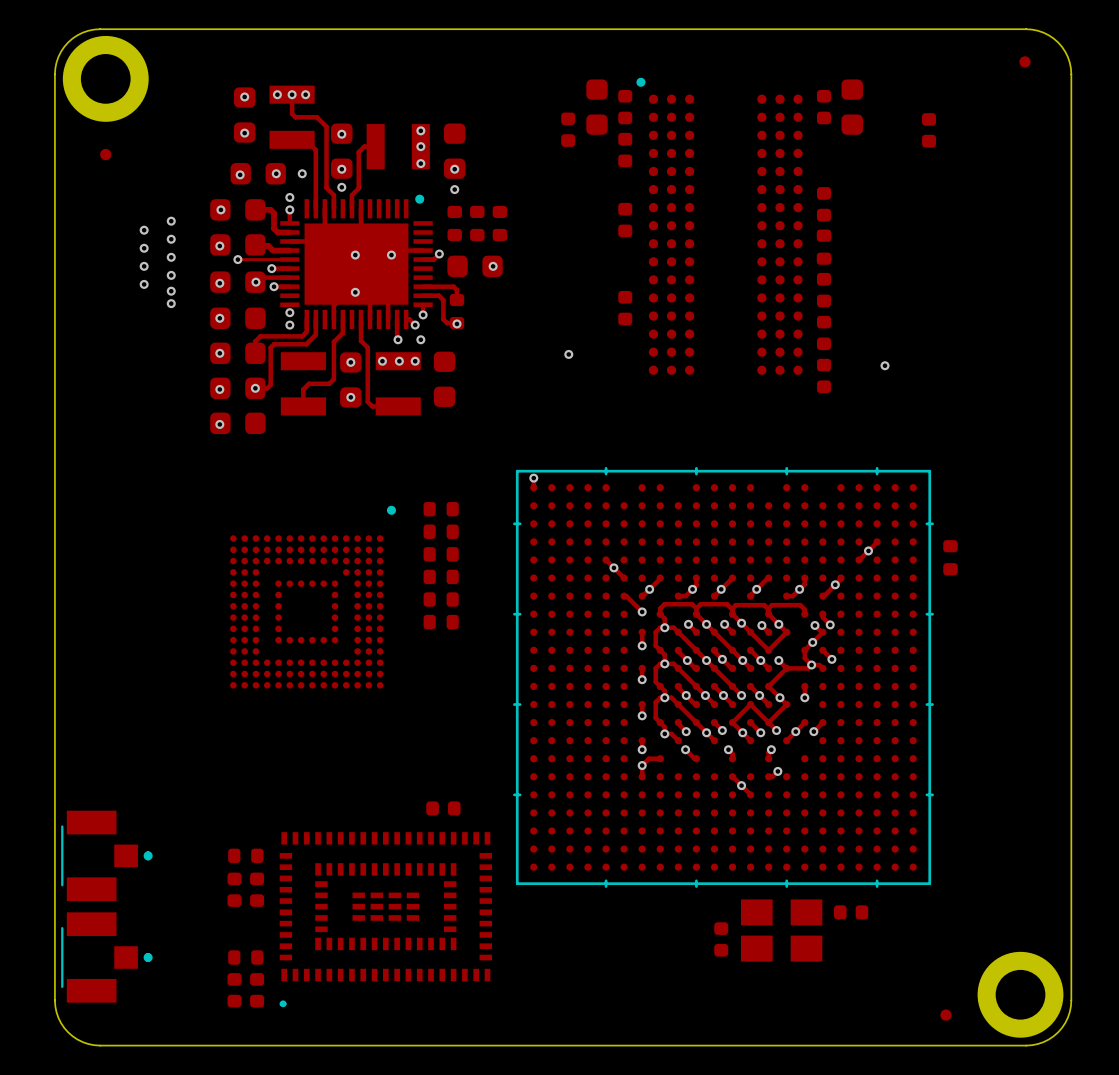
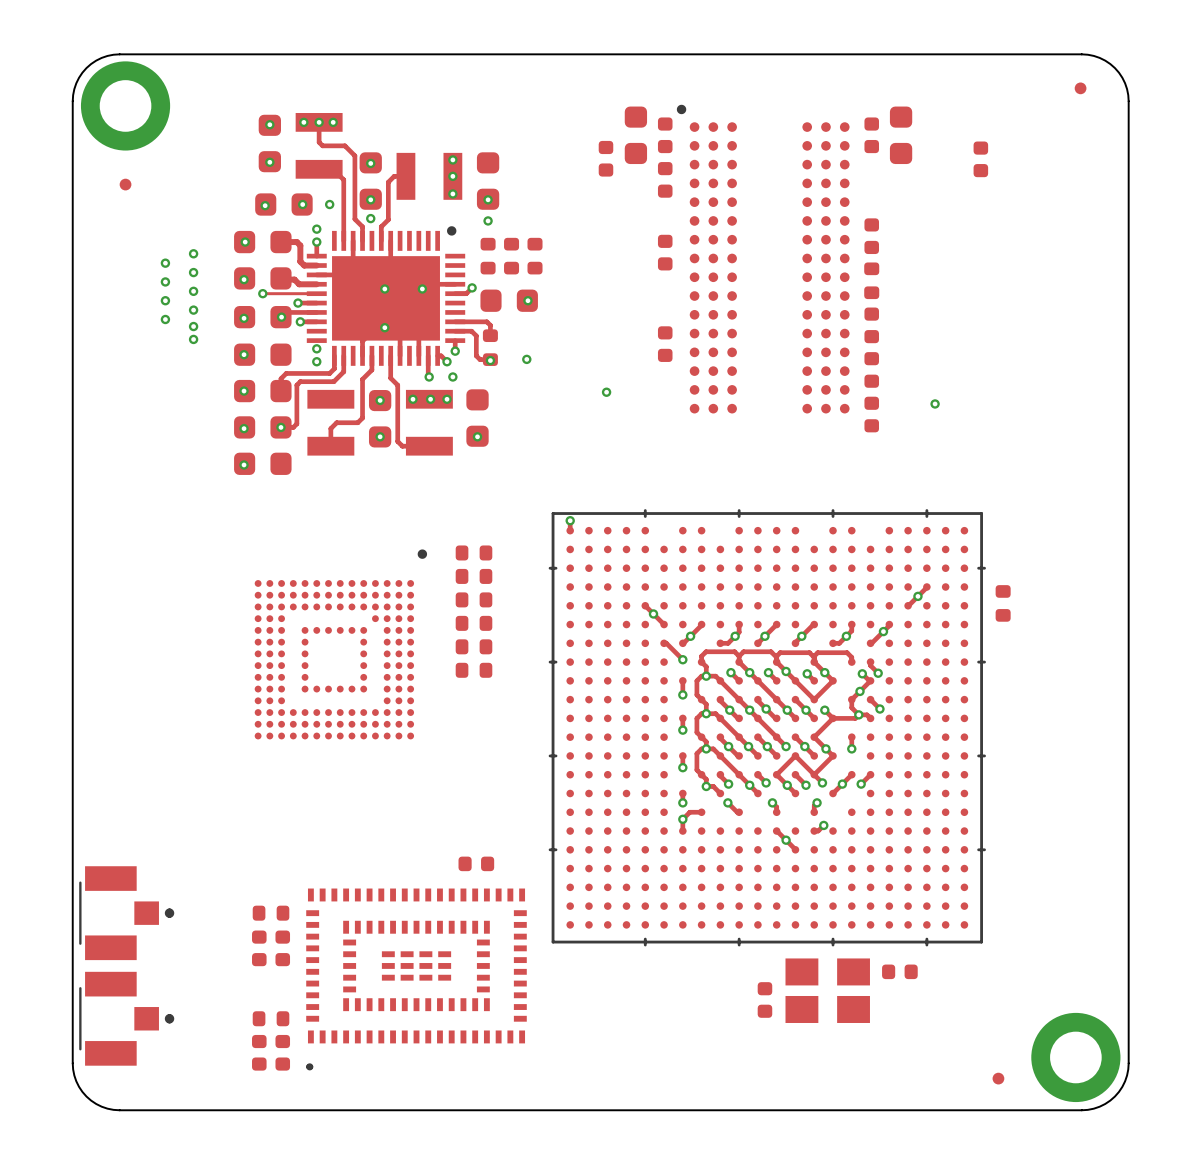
via: none -> (526, 359)
via: none -> (477, 436)

